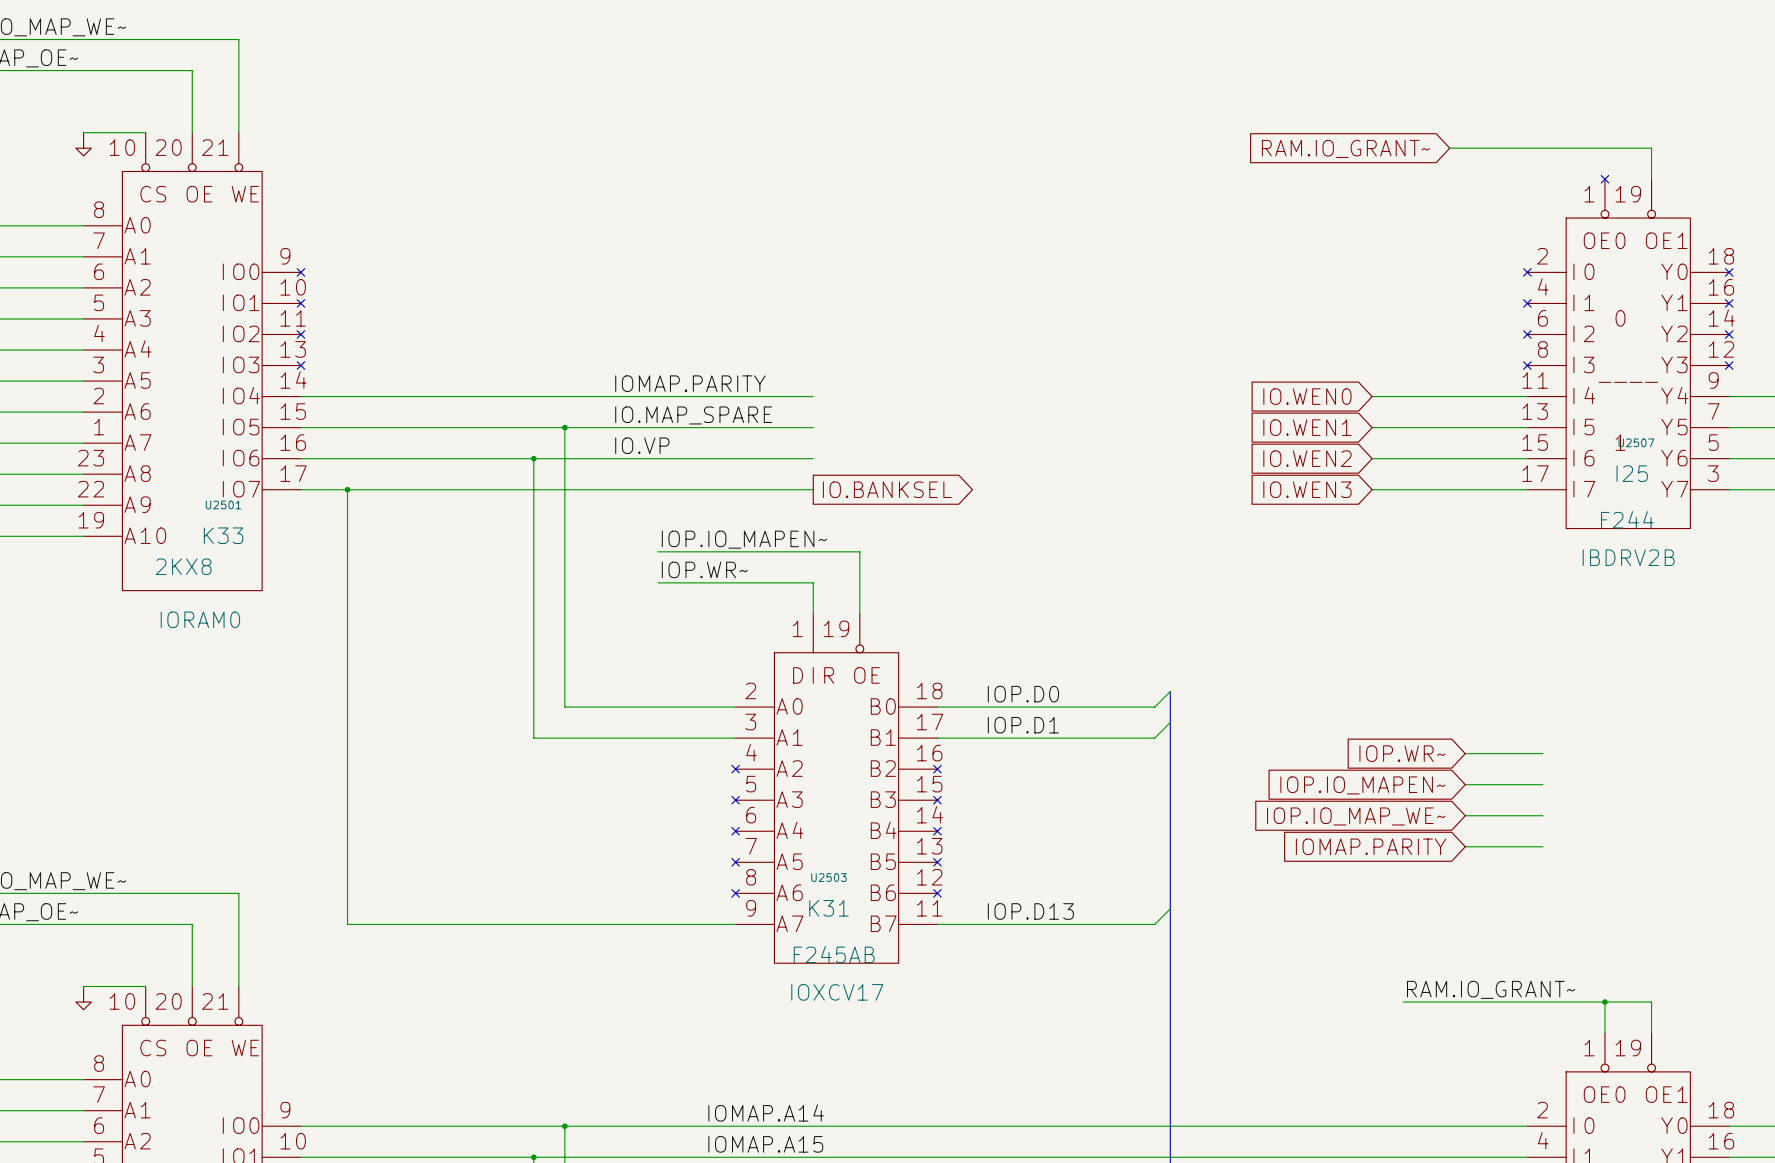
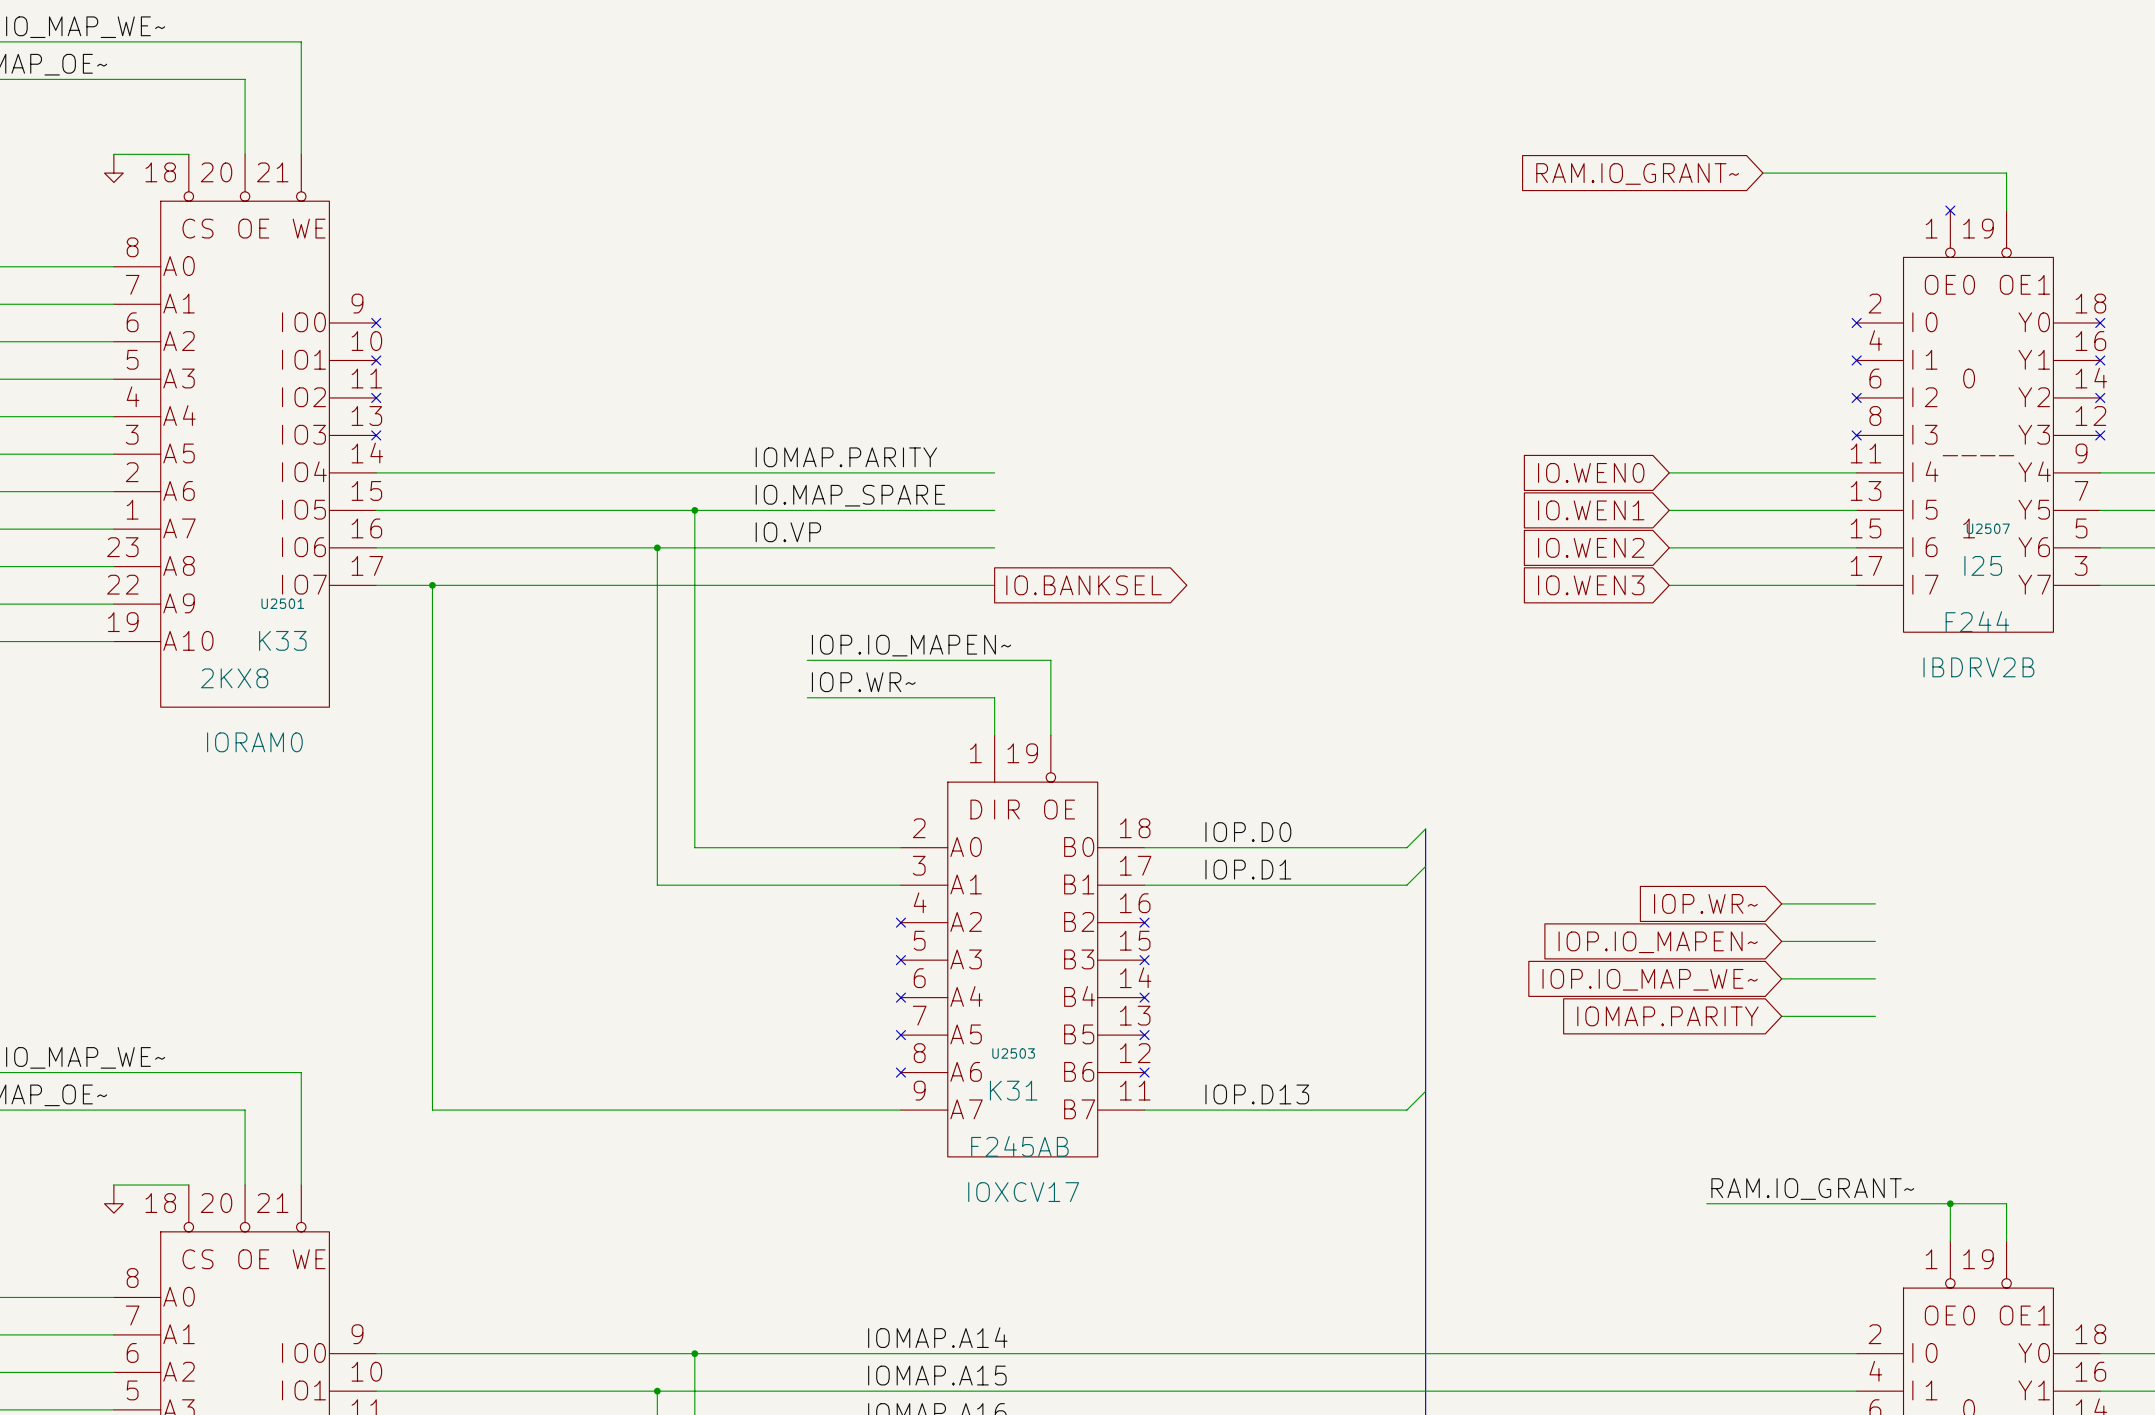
U2501 text: 0 (130, 147) -> 8 (170, 172)
part text: 0 (130, 1001) -> 8 (170, 1203)

